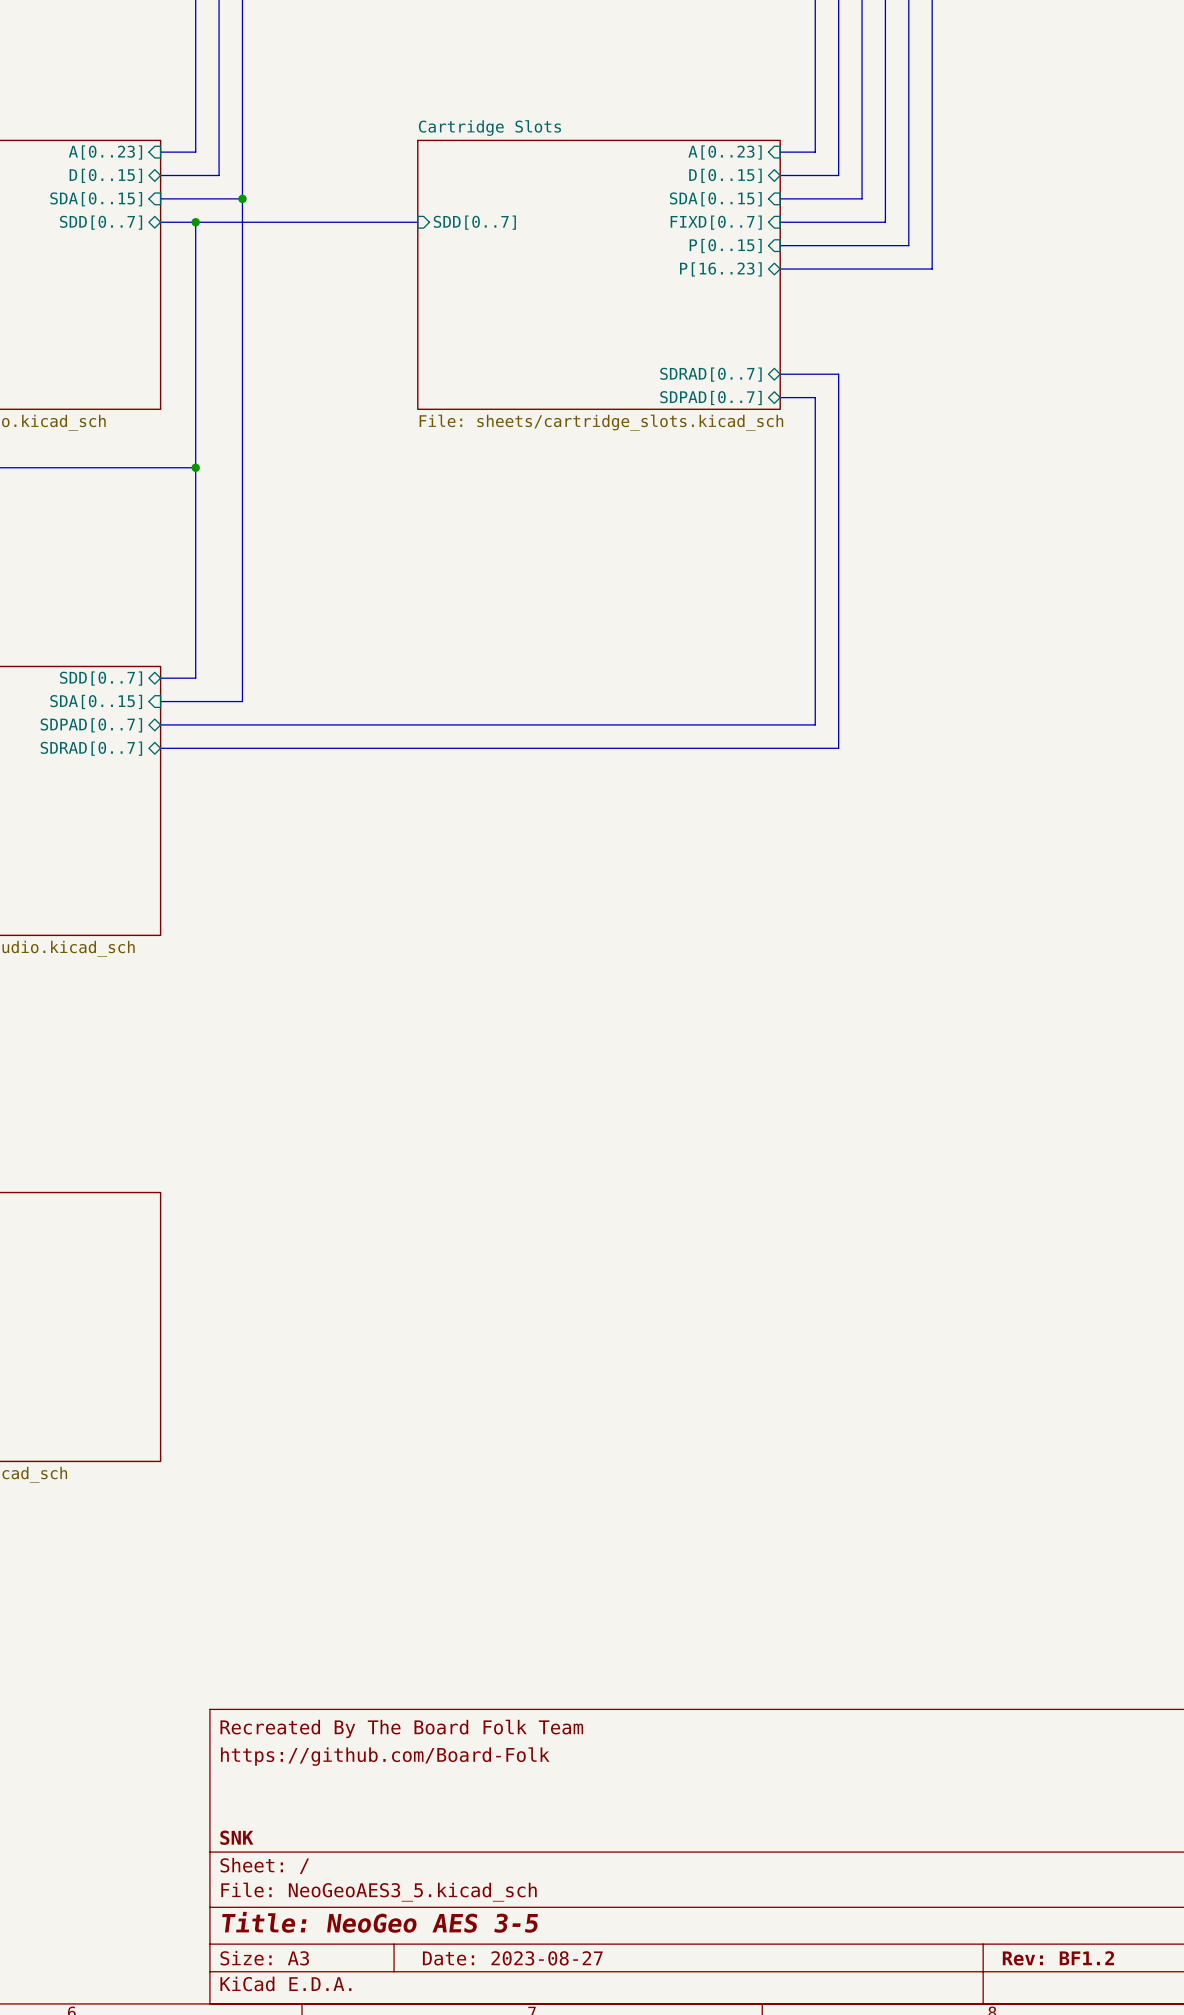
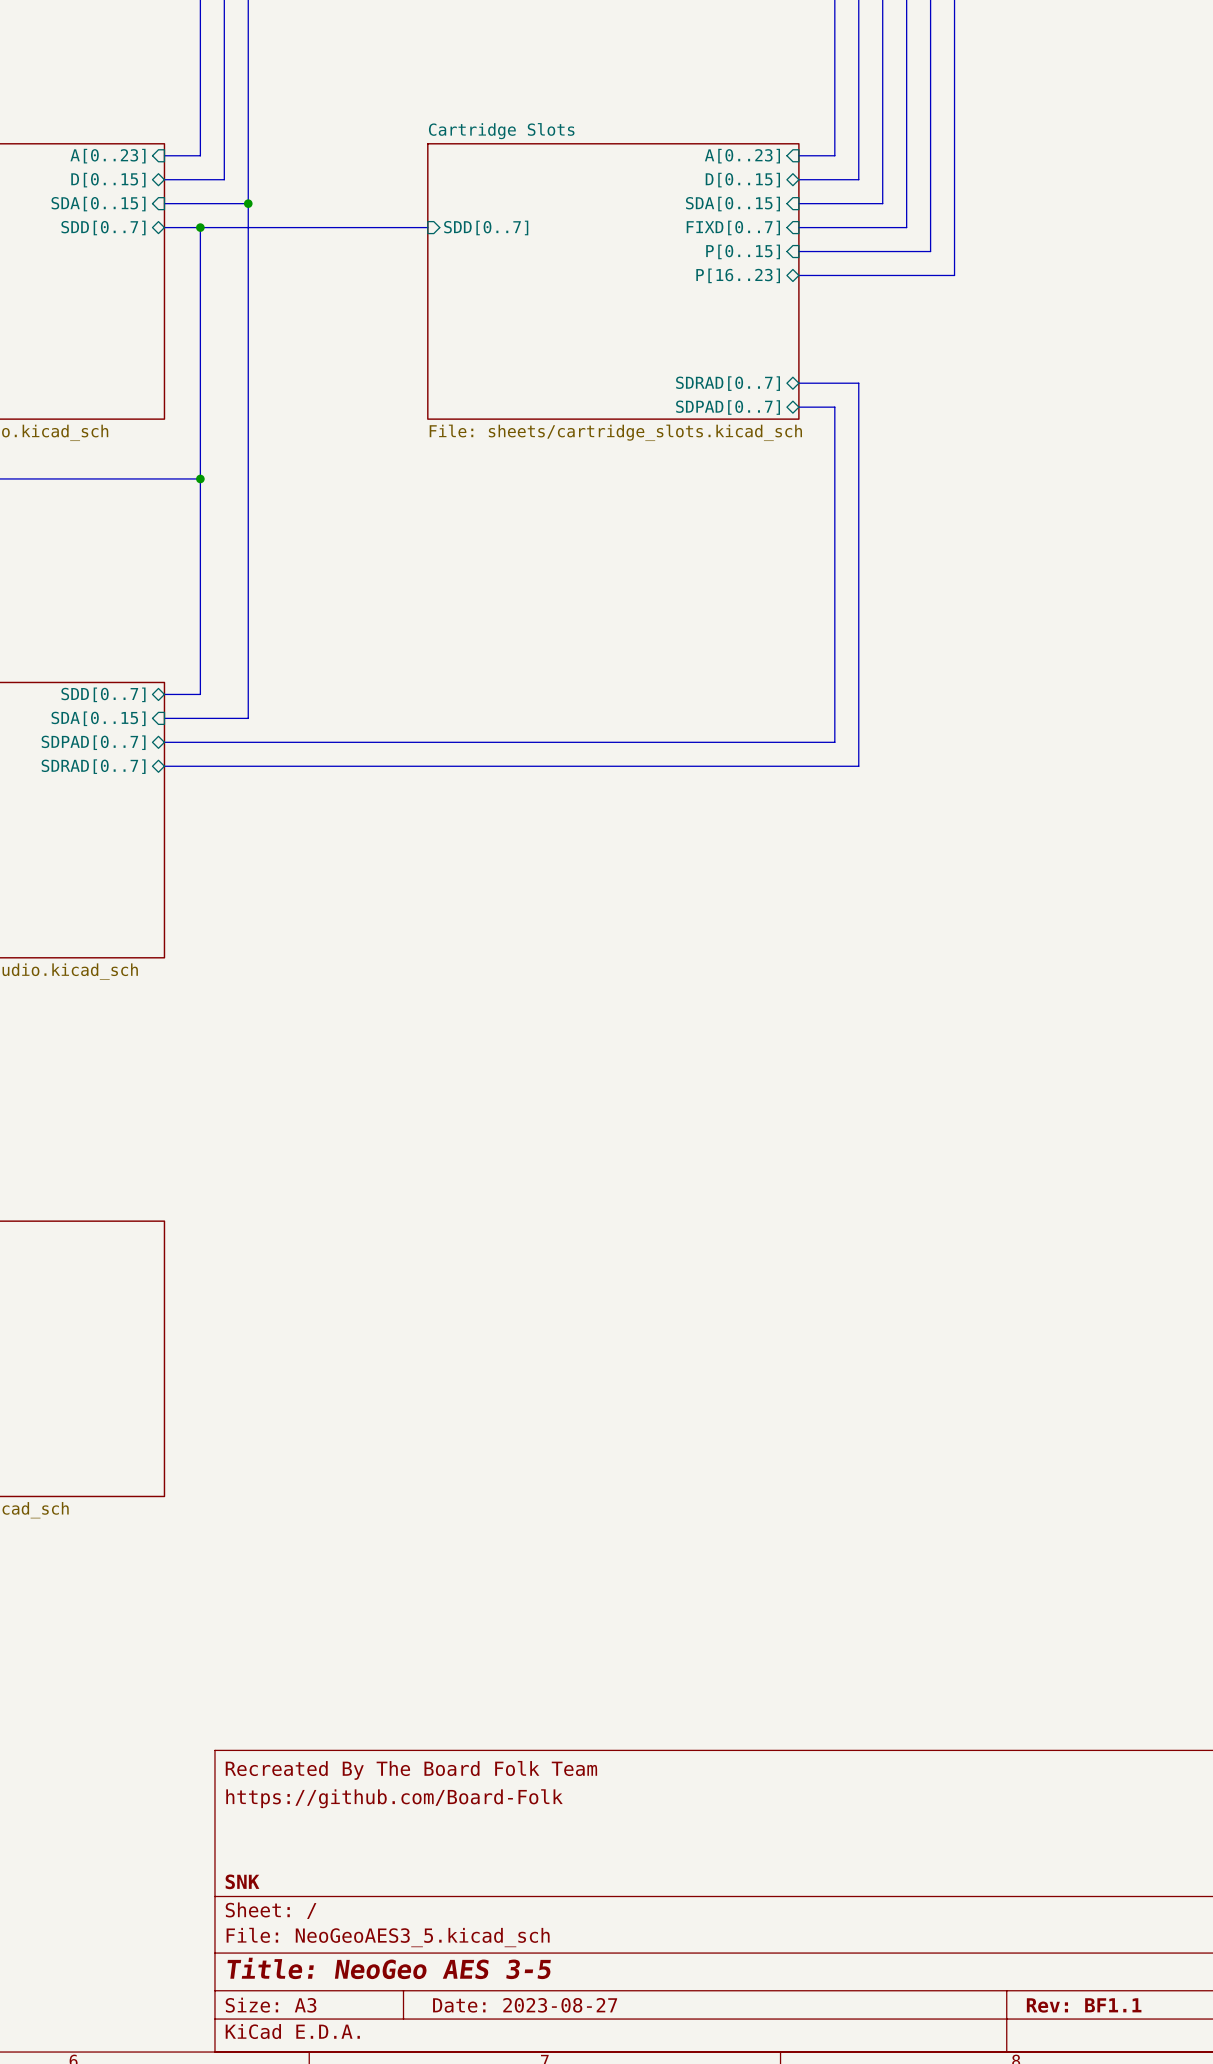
title block: Rev: BF1.2 (1058, 1958) -> Rev: BF1.1 (1084, 2005)

